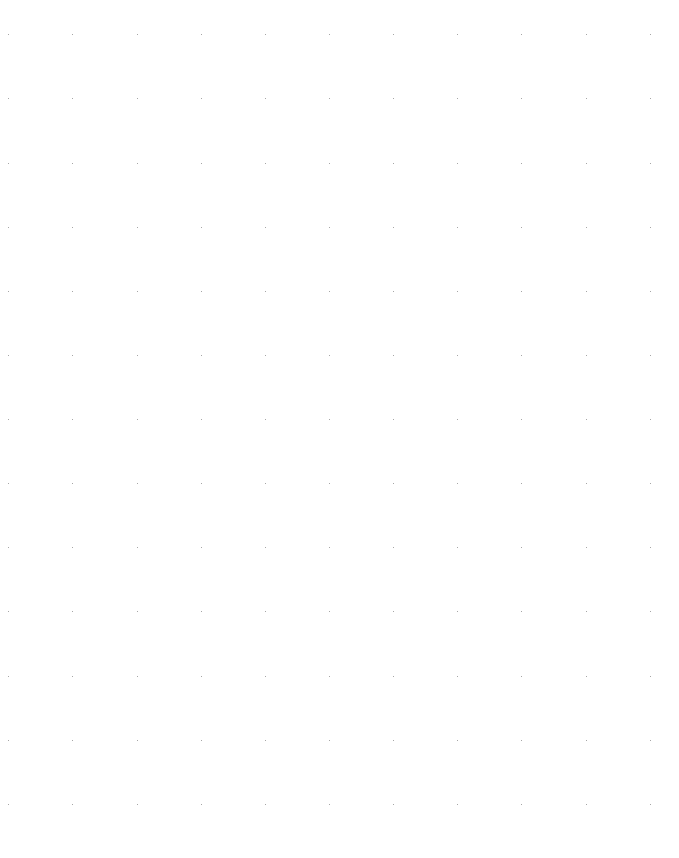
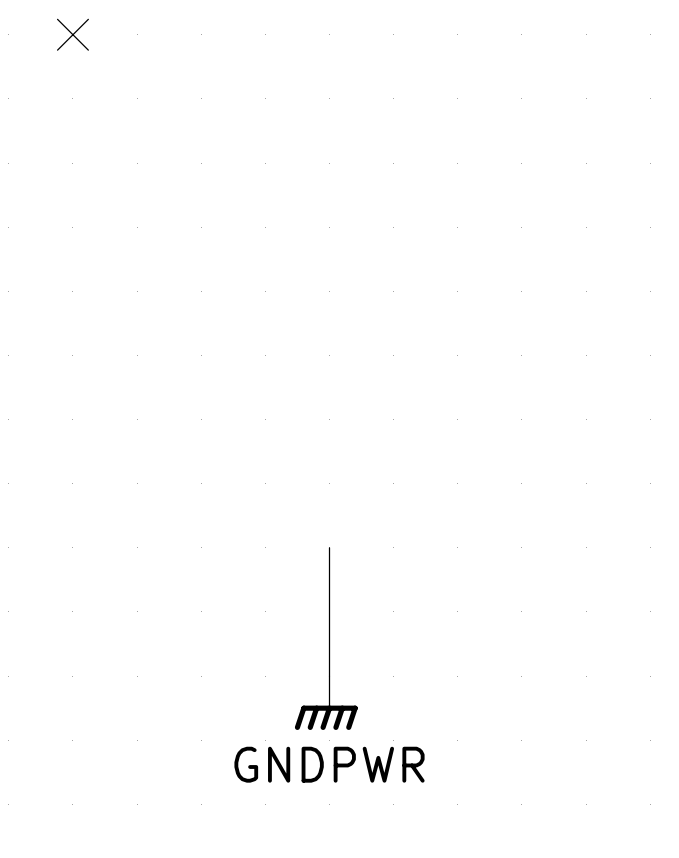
no-connect mark: none -> (72, 34)
wire: none -> (329, 547) (329, 676)
power symbol: none -> GNDPWR (326, 703)

